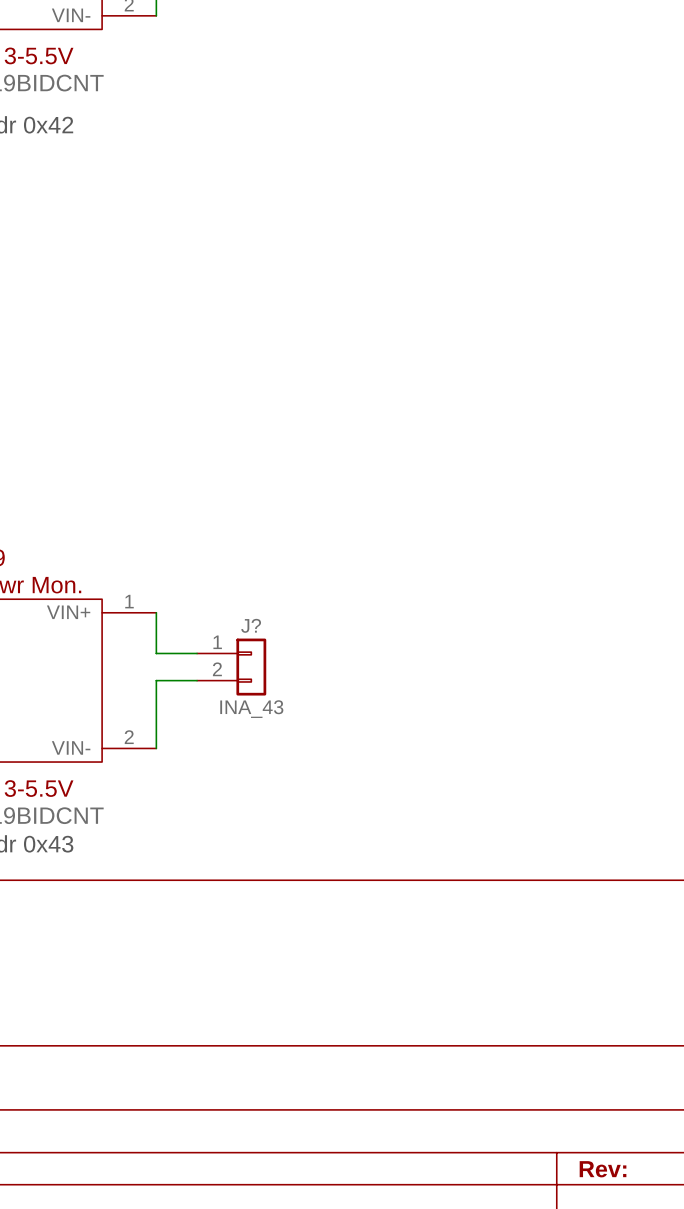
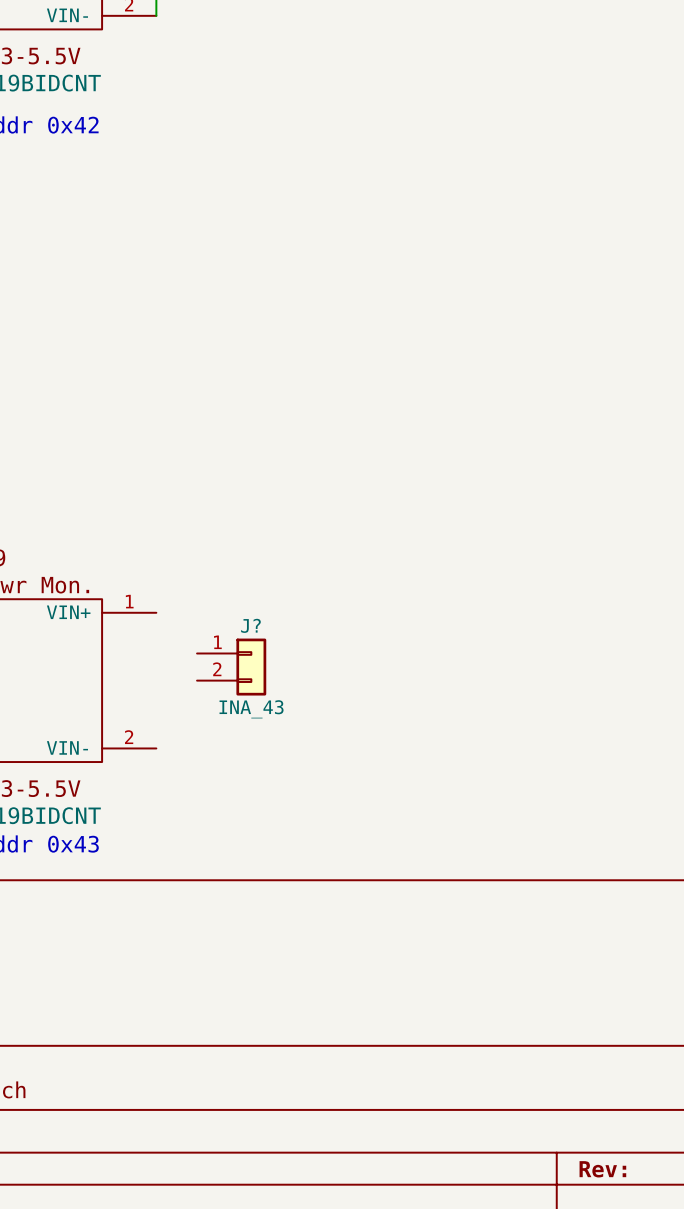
wire: (156, 612) (156, 653) (197, 653) -> none
wire: (197, 680) (156, 680) (156, 748) -> none

